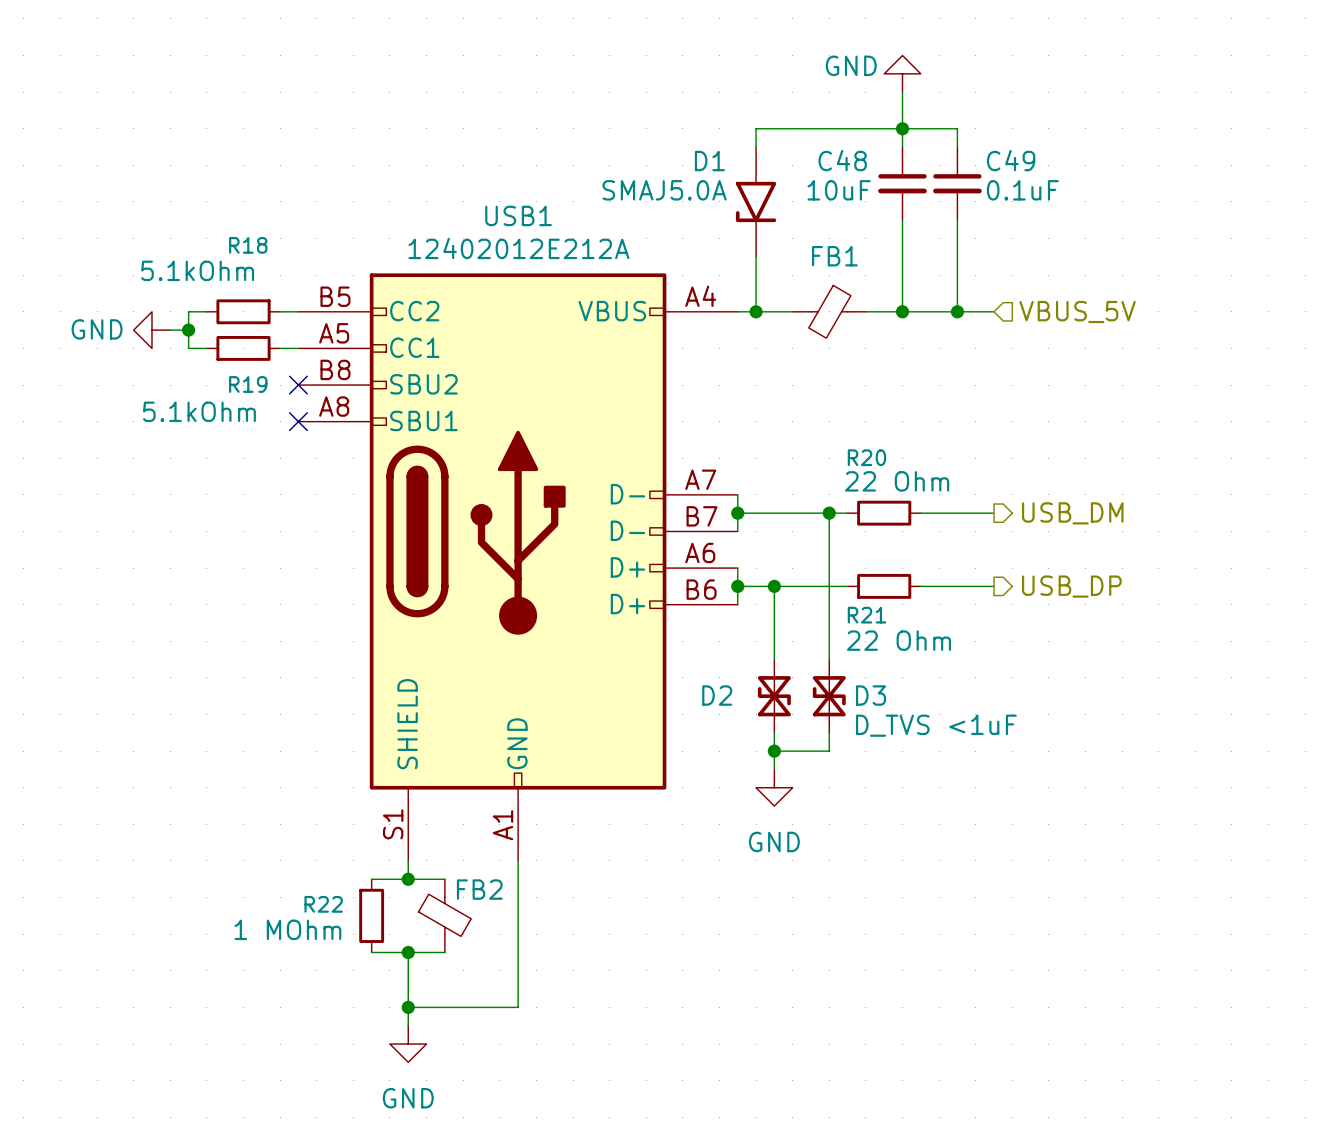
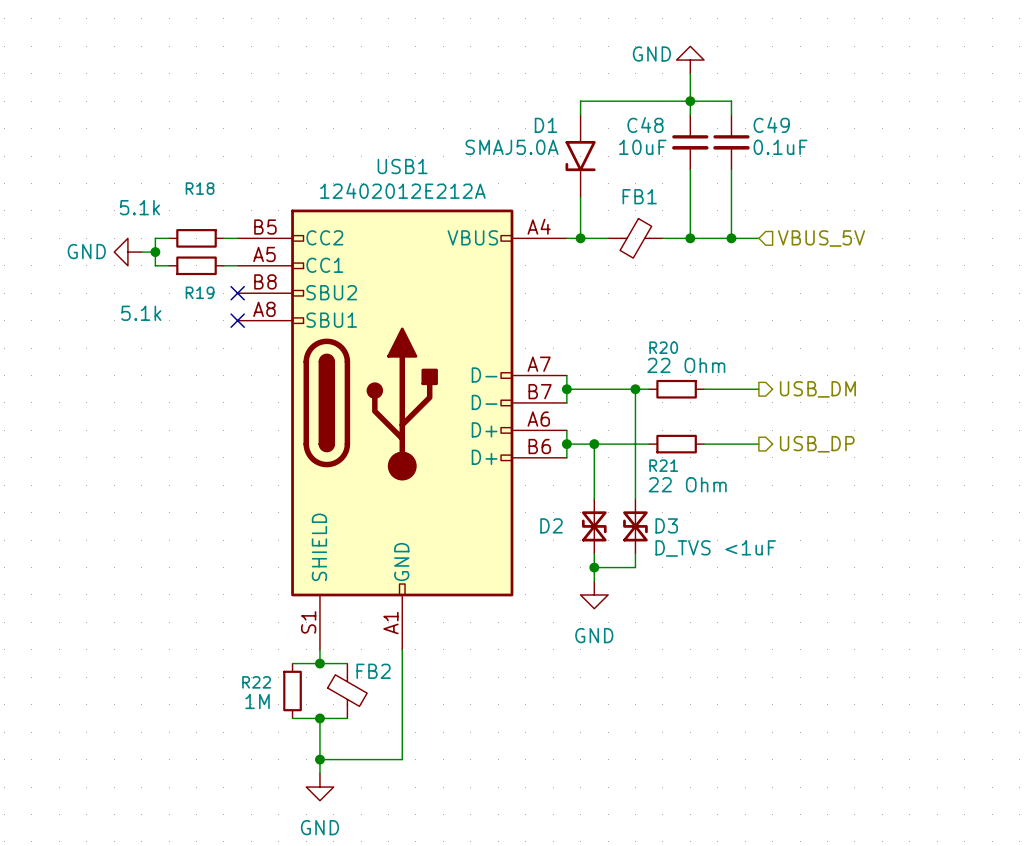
R18 value: 5.1kOhm (197, 270) -> 5.1k (139, 207)
R19 value: 5.1kOhm (199, 411) -> 5.1k (141, 313)
R22 value: 1 MOhm (287, 929) -> 1M (257, 701)

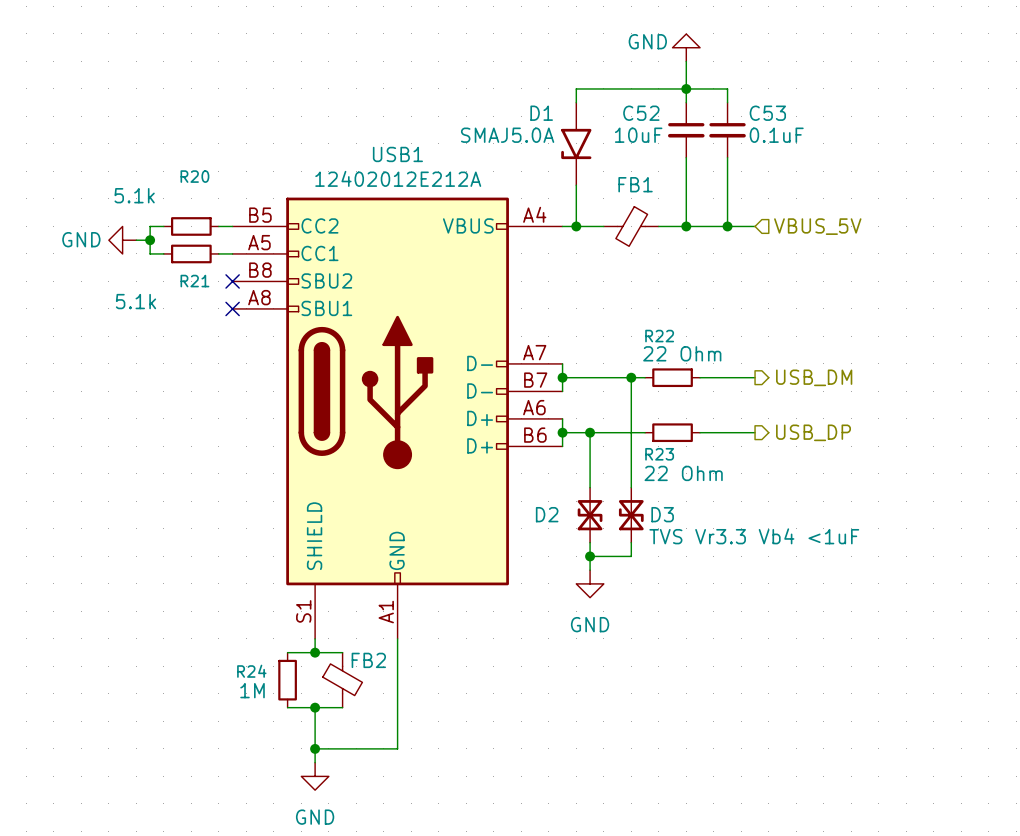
C48 name: C48 (645, 125) -> C52 (641, 113)
C49 name: C49 (771, 125) -> C53 (767, 113)
R18 name: R18 (200, 188) -> R20 (194, 176)
R19 name: R19 (200, 292) -> R21 (194, 281)
R20 name: R20 (663, 347) -> R22 (659, 336)
R21 name: R21 (663, 465) -> R23 (659, 454)
D3 value: D_TVS <1uF (715, 548) -> TVS Vr3.3 Vb4 <1uF (754, 536)
R22 name: R22 (256, 682) -> R24 (251, 671)

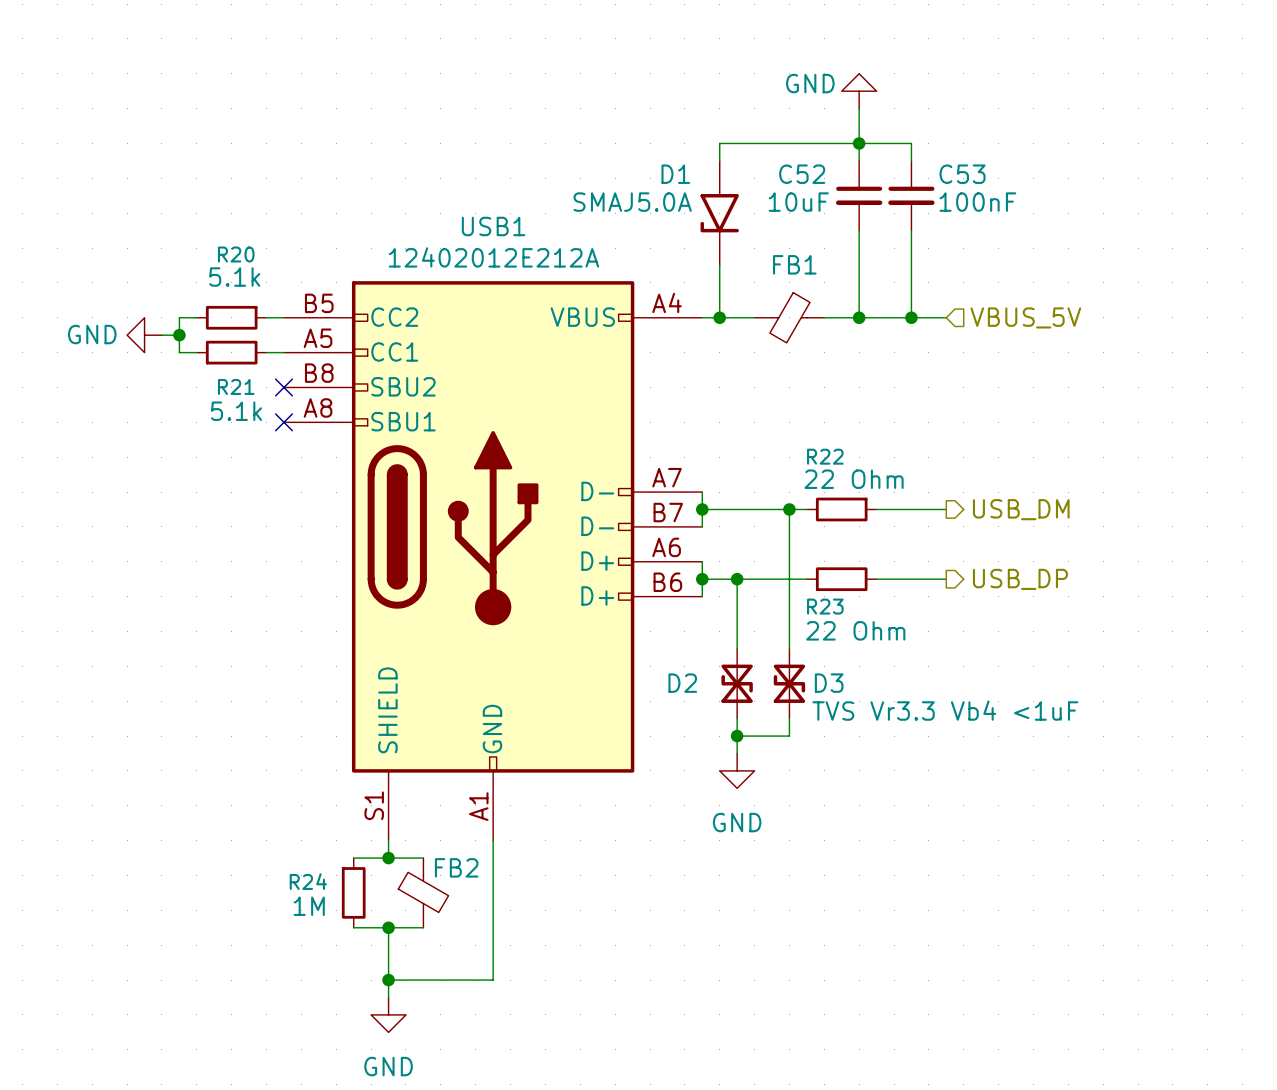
C53 value: 0.1uF (776, 135) -> 100nF (977, 202)
R20 value position: 5.1k (134, 195) -> 5.1k (234, 277)
R21 value position: 5.1k (136, 301) -> 5.1k (236, 411)

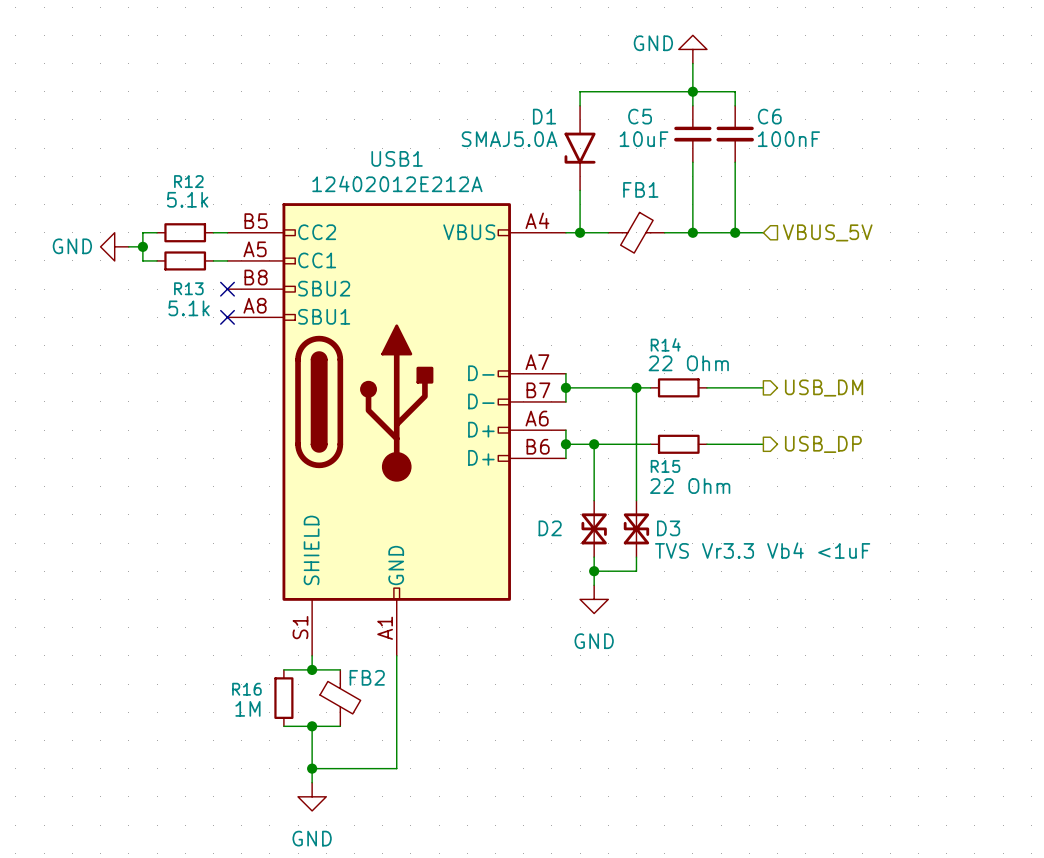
C52 name: C52 (802, 174) -> C5 (640, 116)
C53 name: C53 (962, 174) -> C6 (769, 116)
R20 name: R20 (236, 254) -> R12 (188, 181)
R21 name: R21 (236, 386) -> R13 (188, 288)
R22 name: R22 (825, 456) -> R14 (665, 344)
R23 name: R23 (825, 606) -> R15 (665, 466)
R24 name: R24 (308, 881) -> R16 (246, 689)

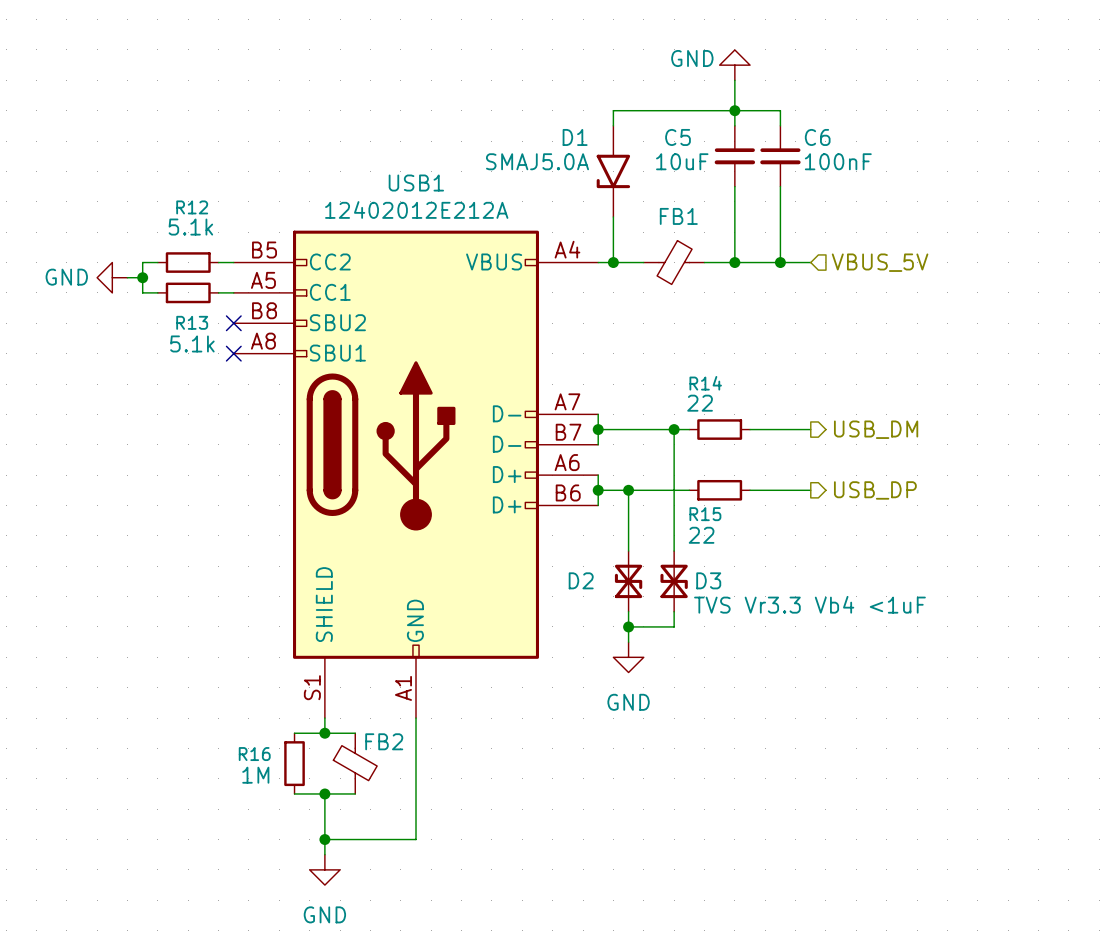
R14 value: 22 Ohm (688, 363) -> 22 (700, 403)
R15 value: 22 Ohm (690, 486) -> 22 (701, 535)

